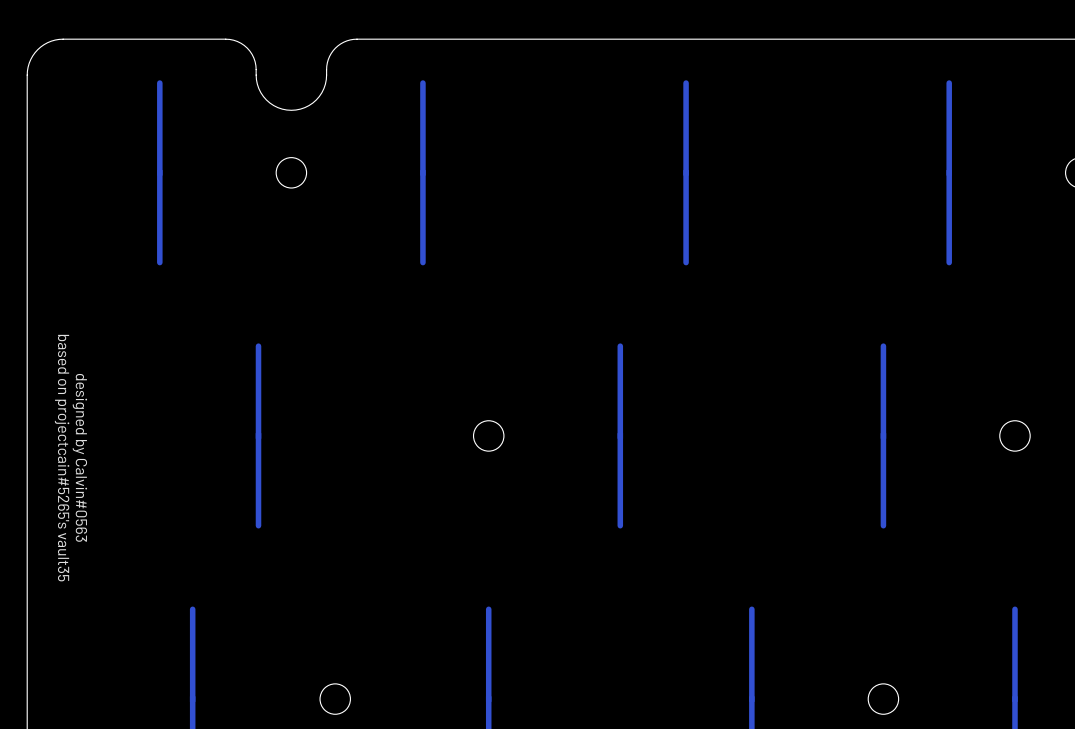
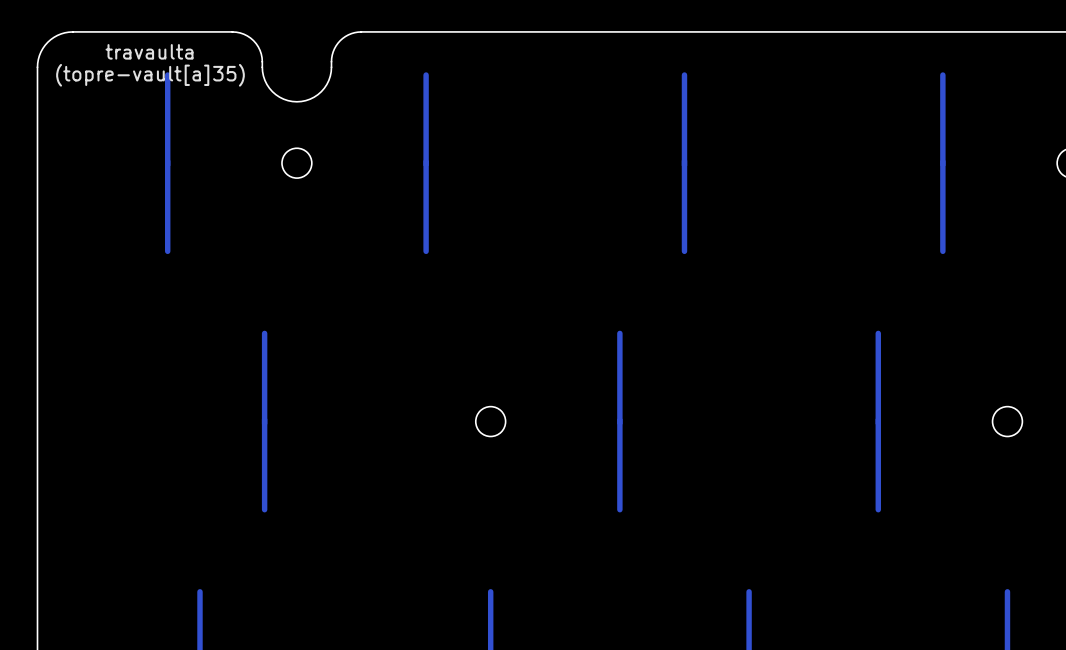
text: none -> travaulta (149, 51)
text: none -> (topre-vault[a]35) (150, 75)
text: designed by Calvin#0563 (79, 457) -> none
text: based on projectcain#5265's vault35 (62, 458) -> none

